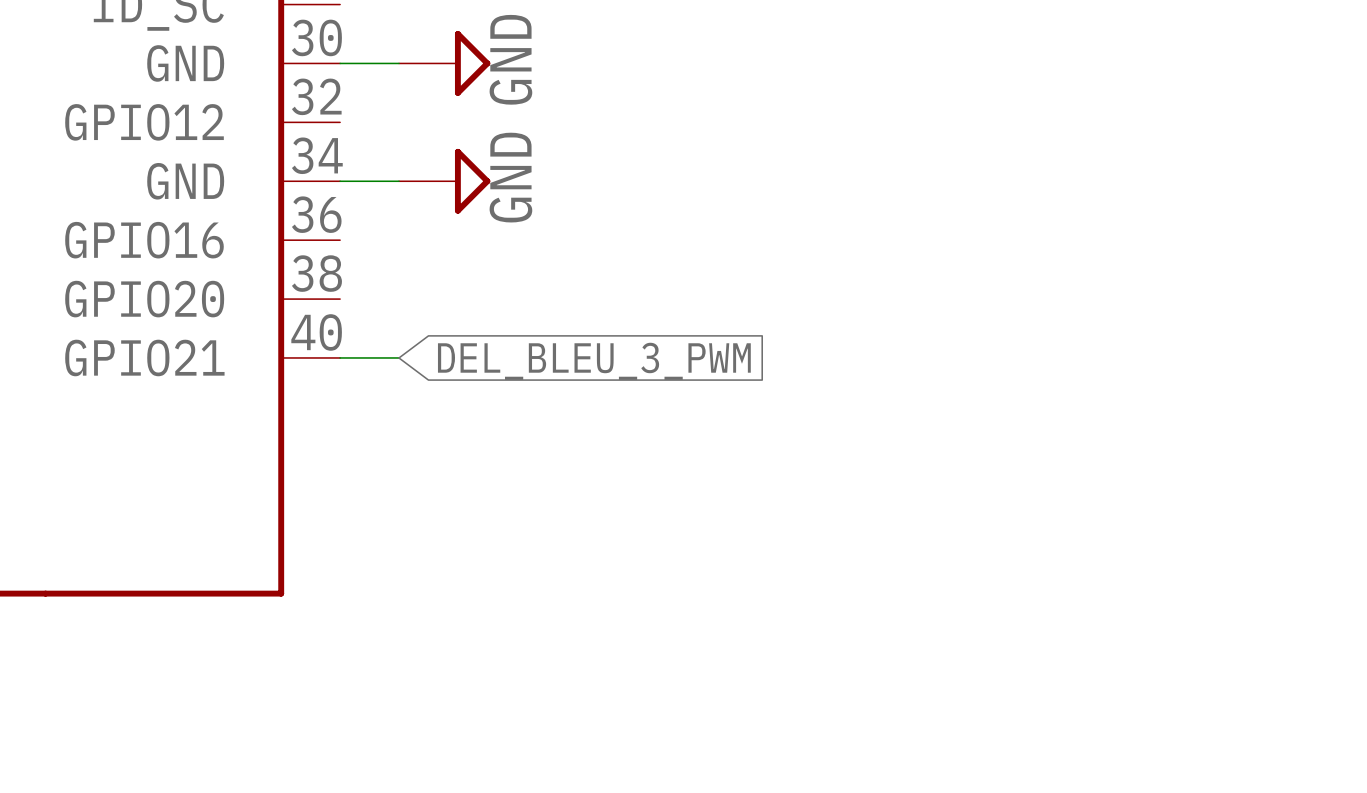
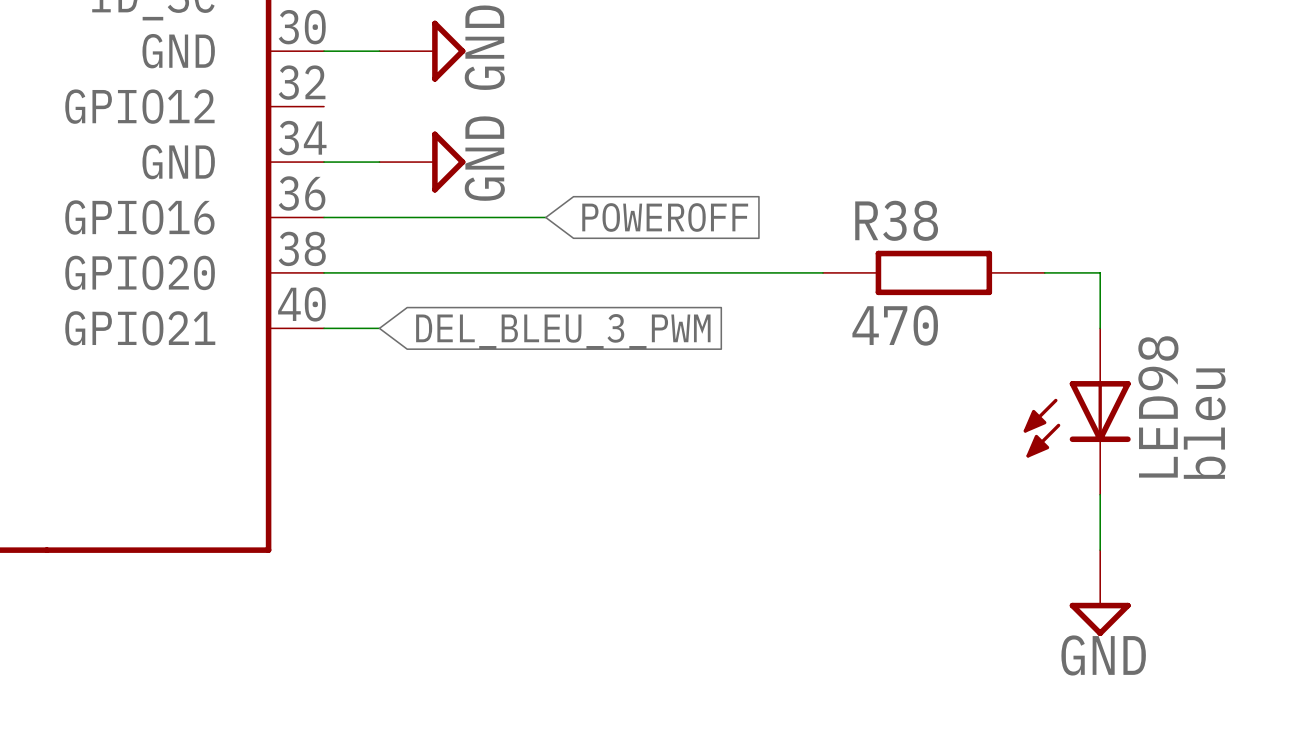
wire: none -> (324, 217) (545, 217)
global label: none -> POWEROFF (665, 217)
wire: none -> (324, 272) (822, 272)
R38: none -> 470 (933, 272)
wire: none -> (1044, 272) (1100, 272) (1100, 328)
LED98: none -> bleu (1077, 411)
wire: none -> (1100, 494) (1100, 550)
power symbol: none -> GND (1100, 593)

